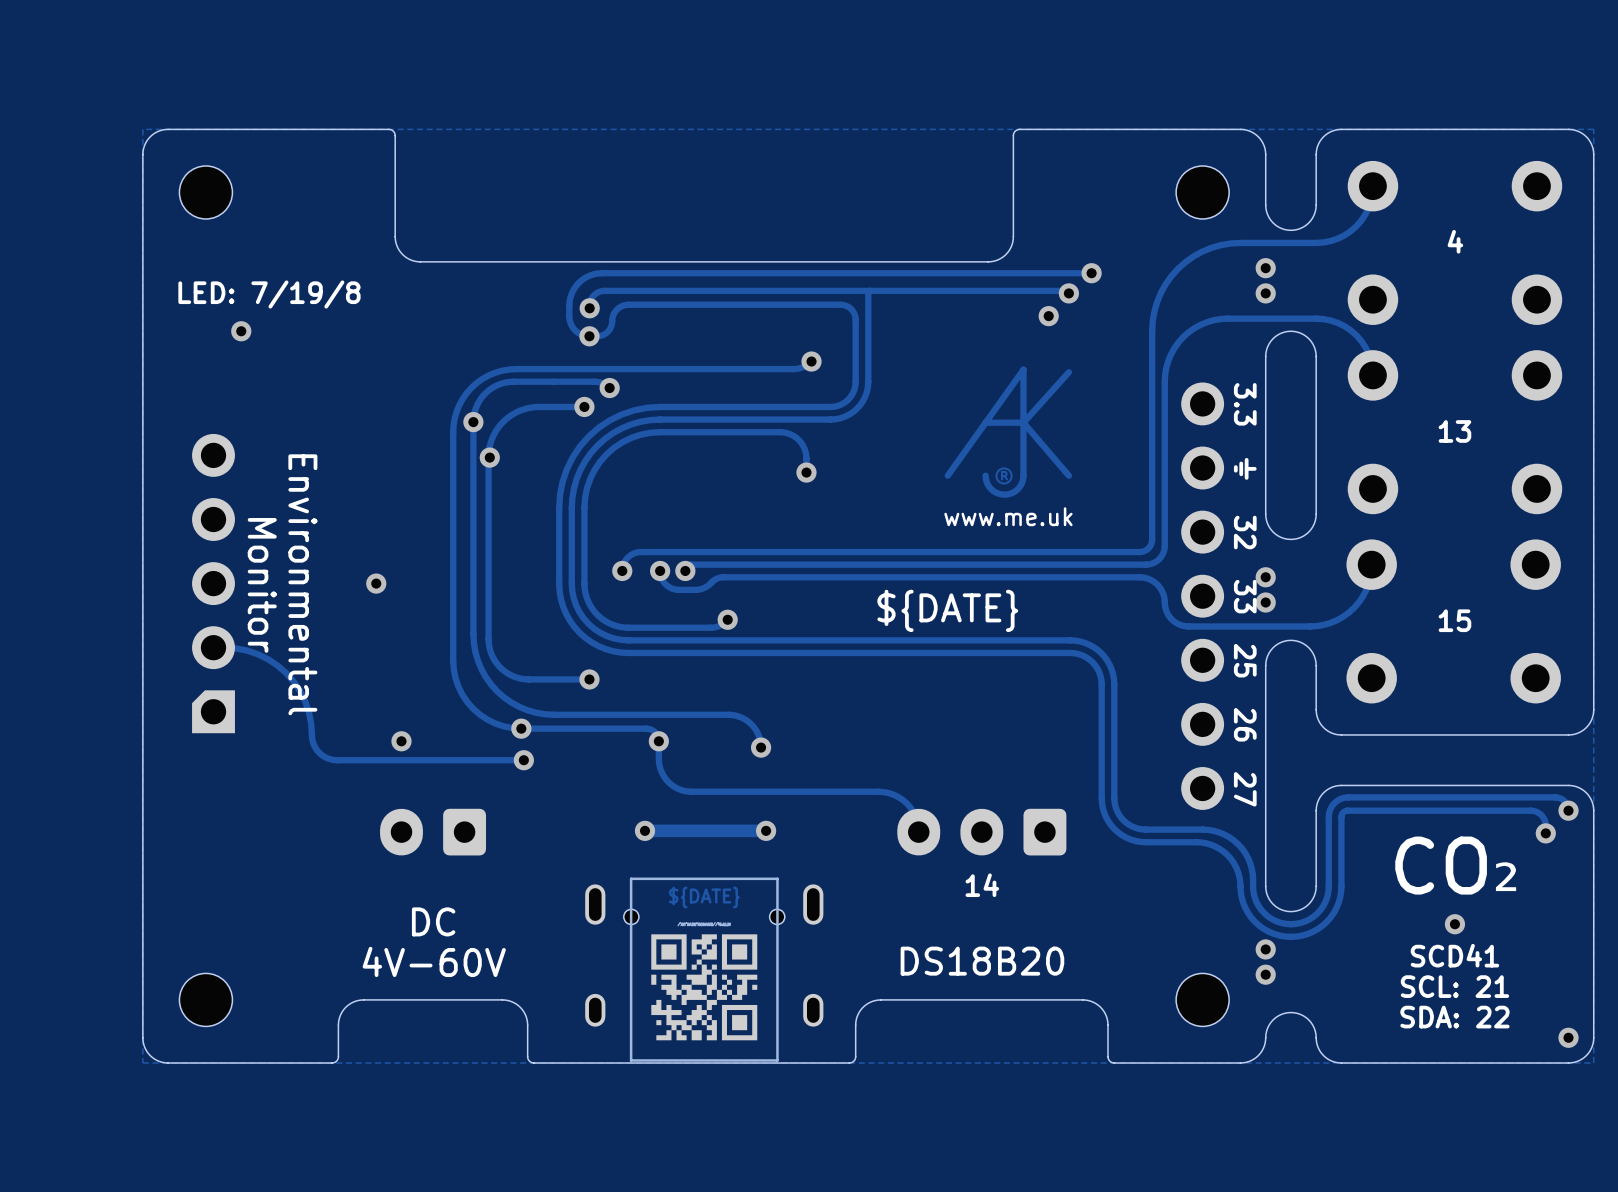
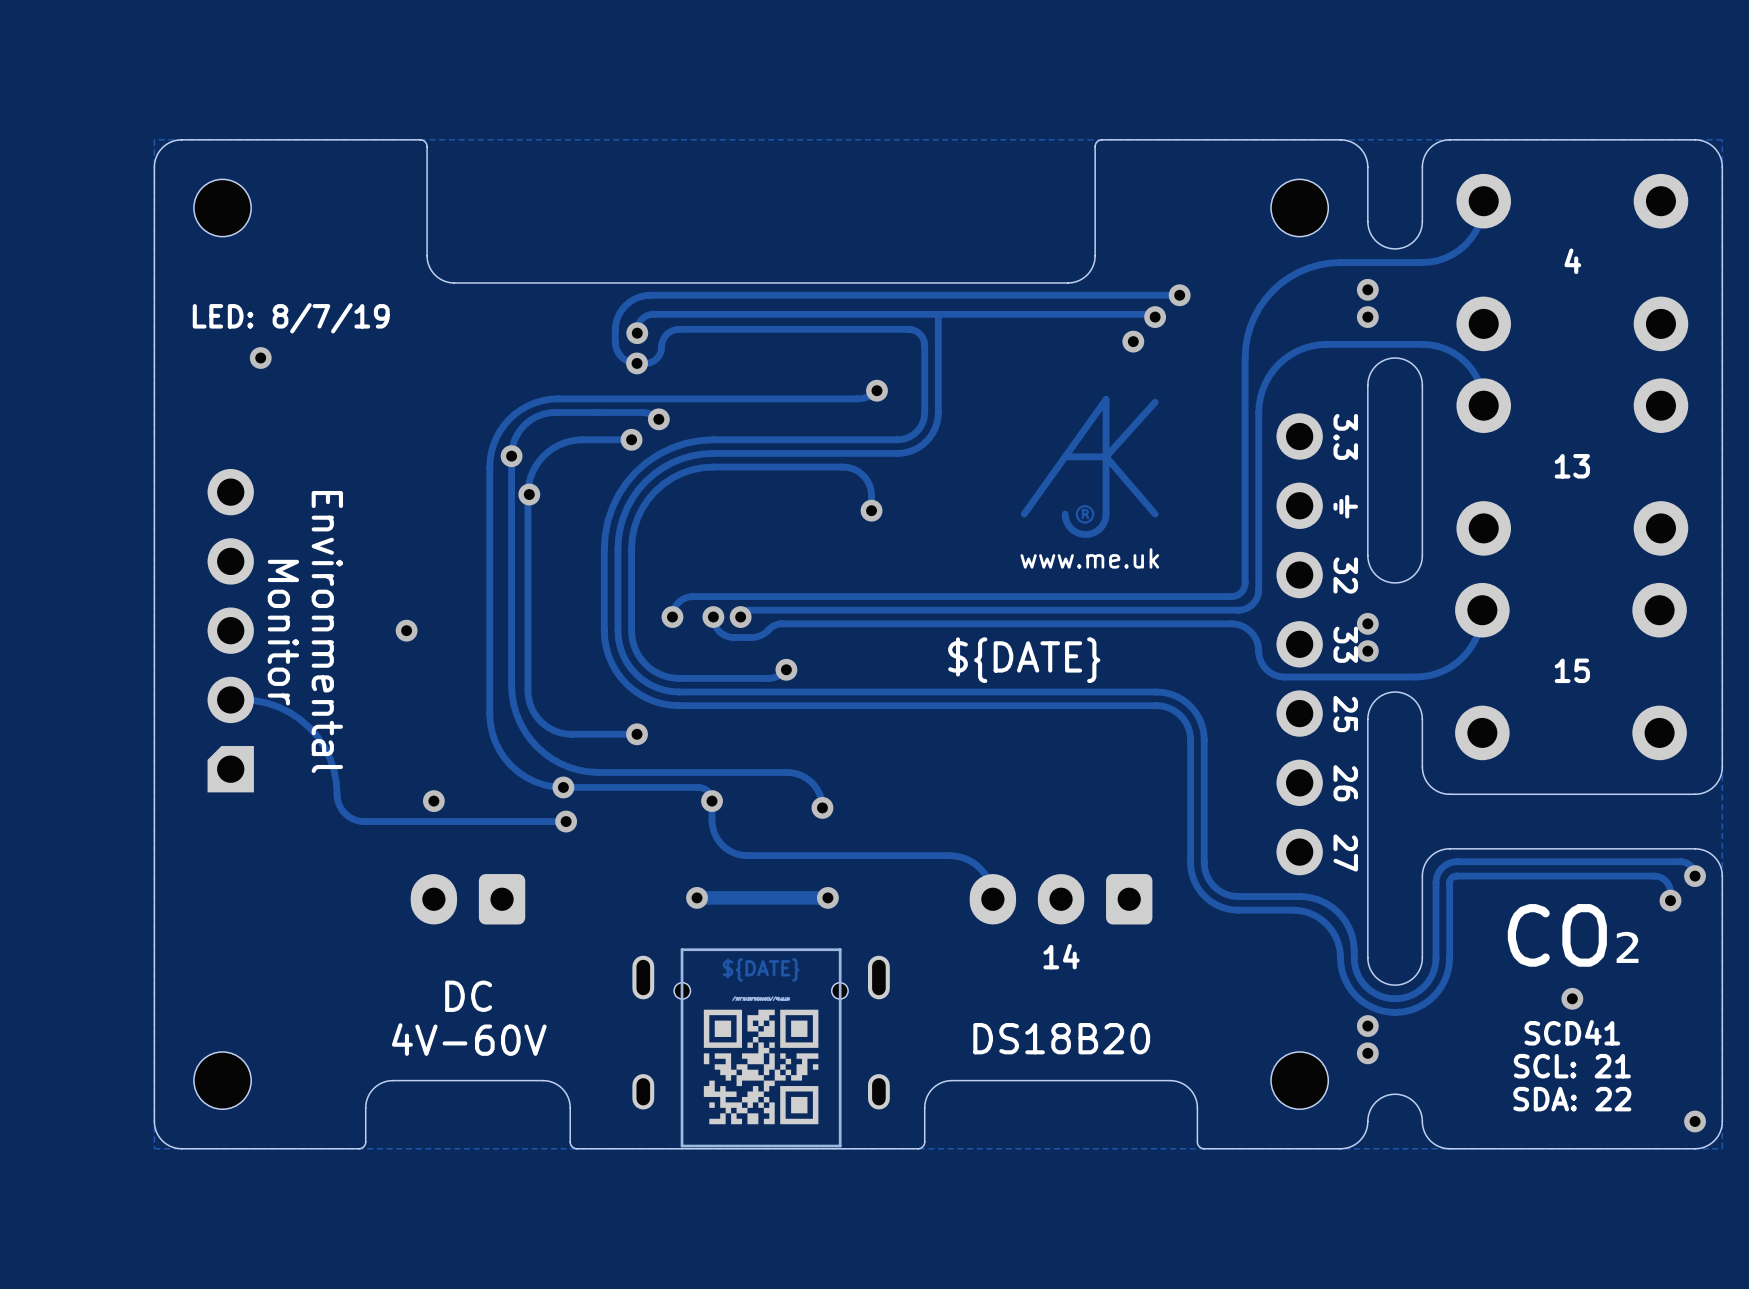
text: LED: 7/19/8 (269, 294) -> LED: 8/7/19 (291, 318)

